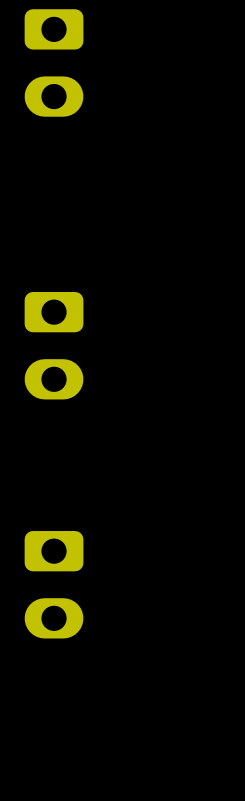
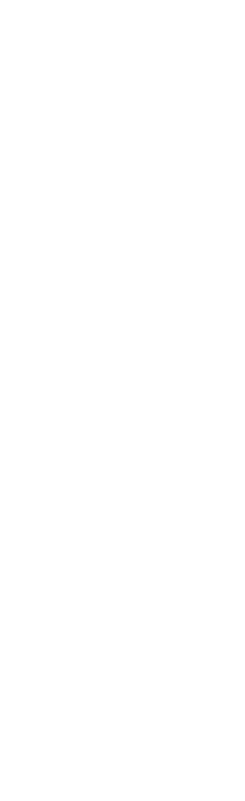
part: (54, 62) -> none
part: (54, 345) -> none
part: (54, 584) -> none

